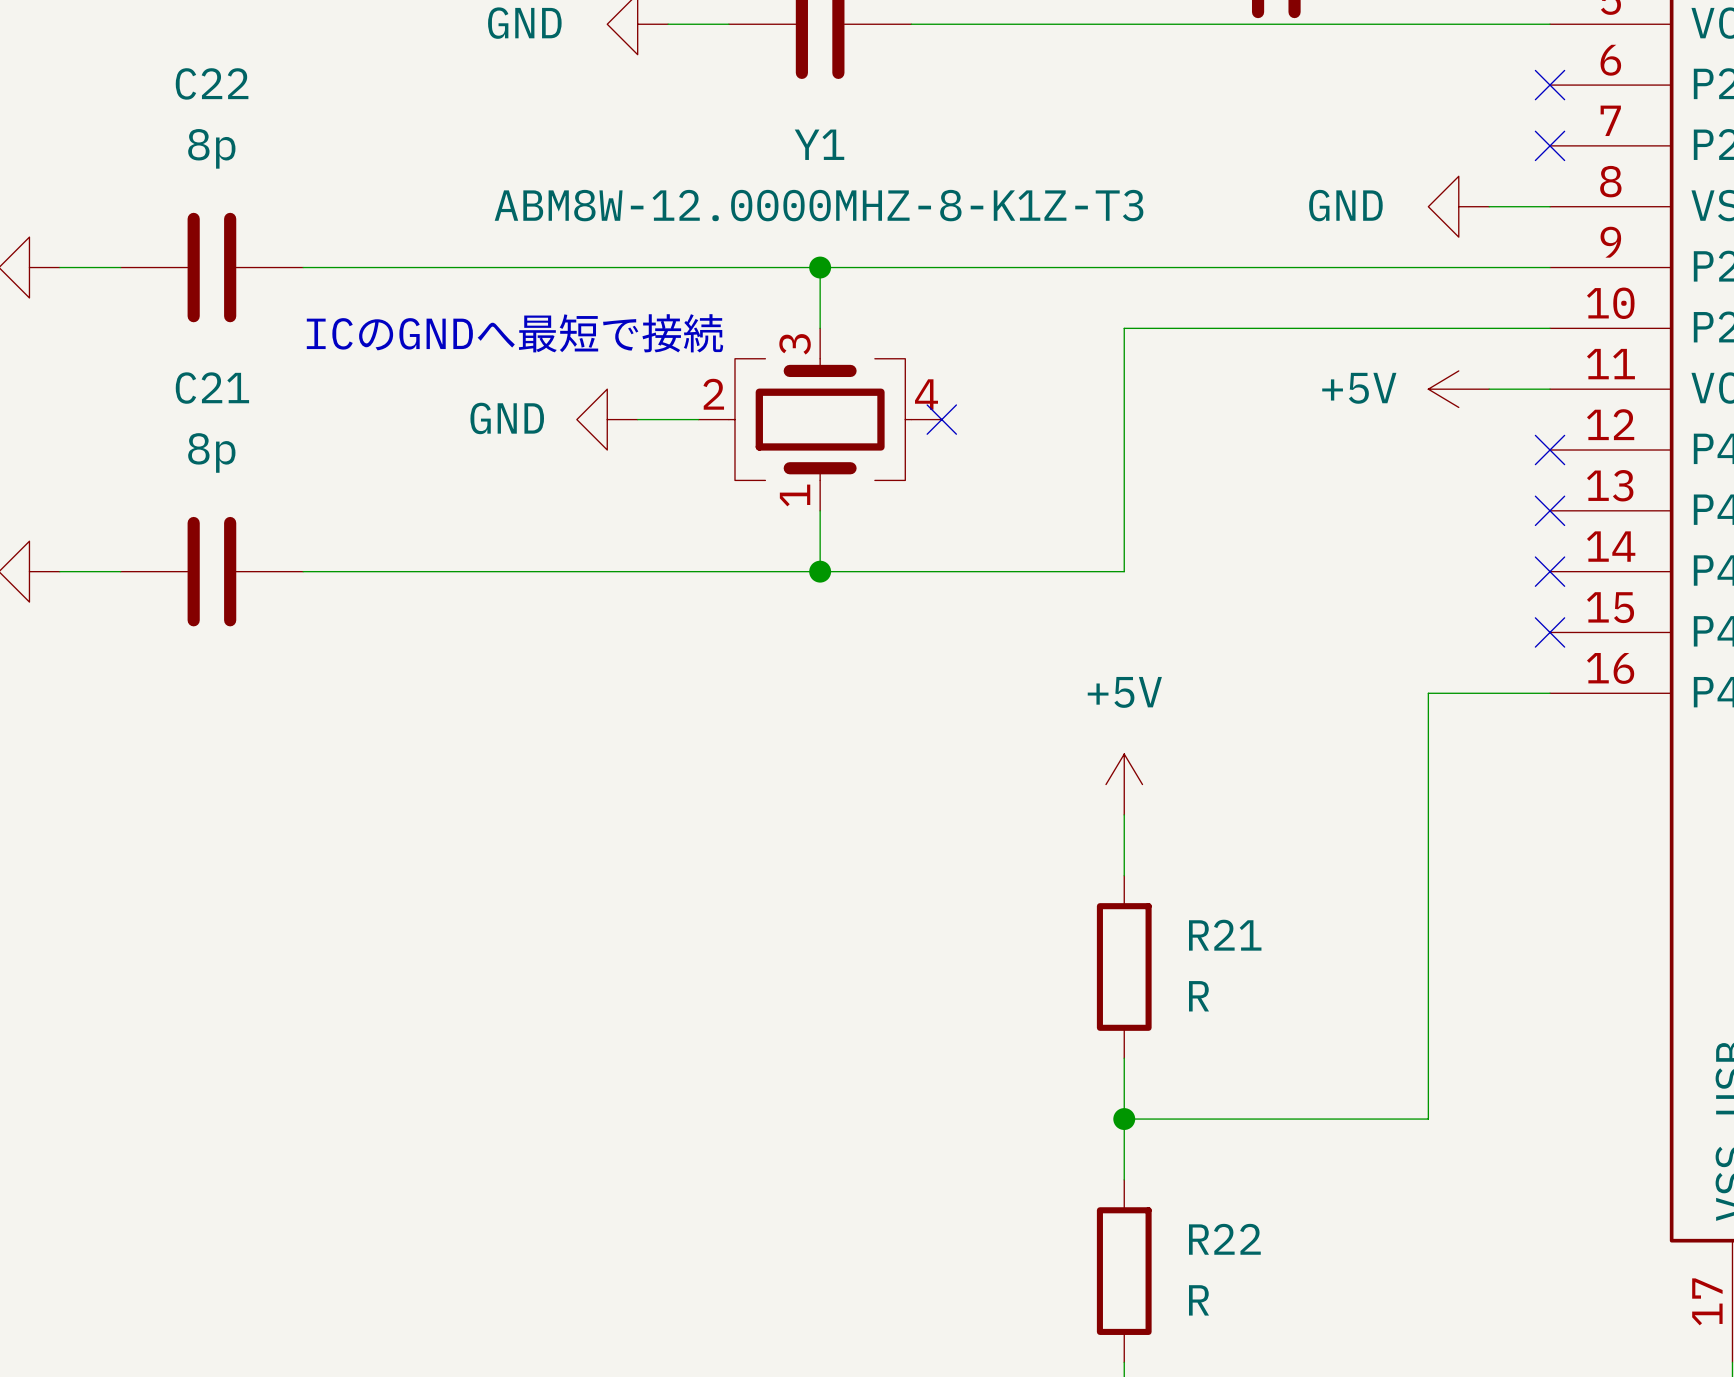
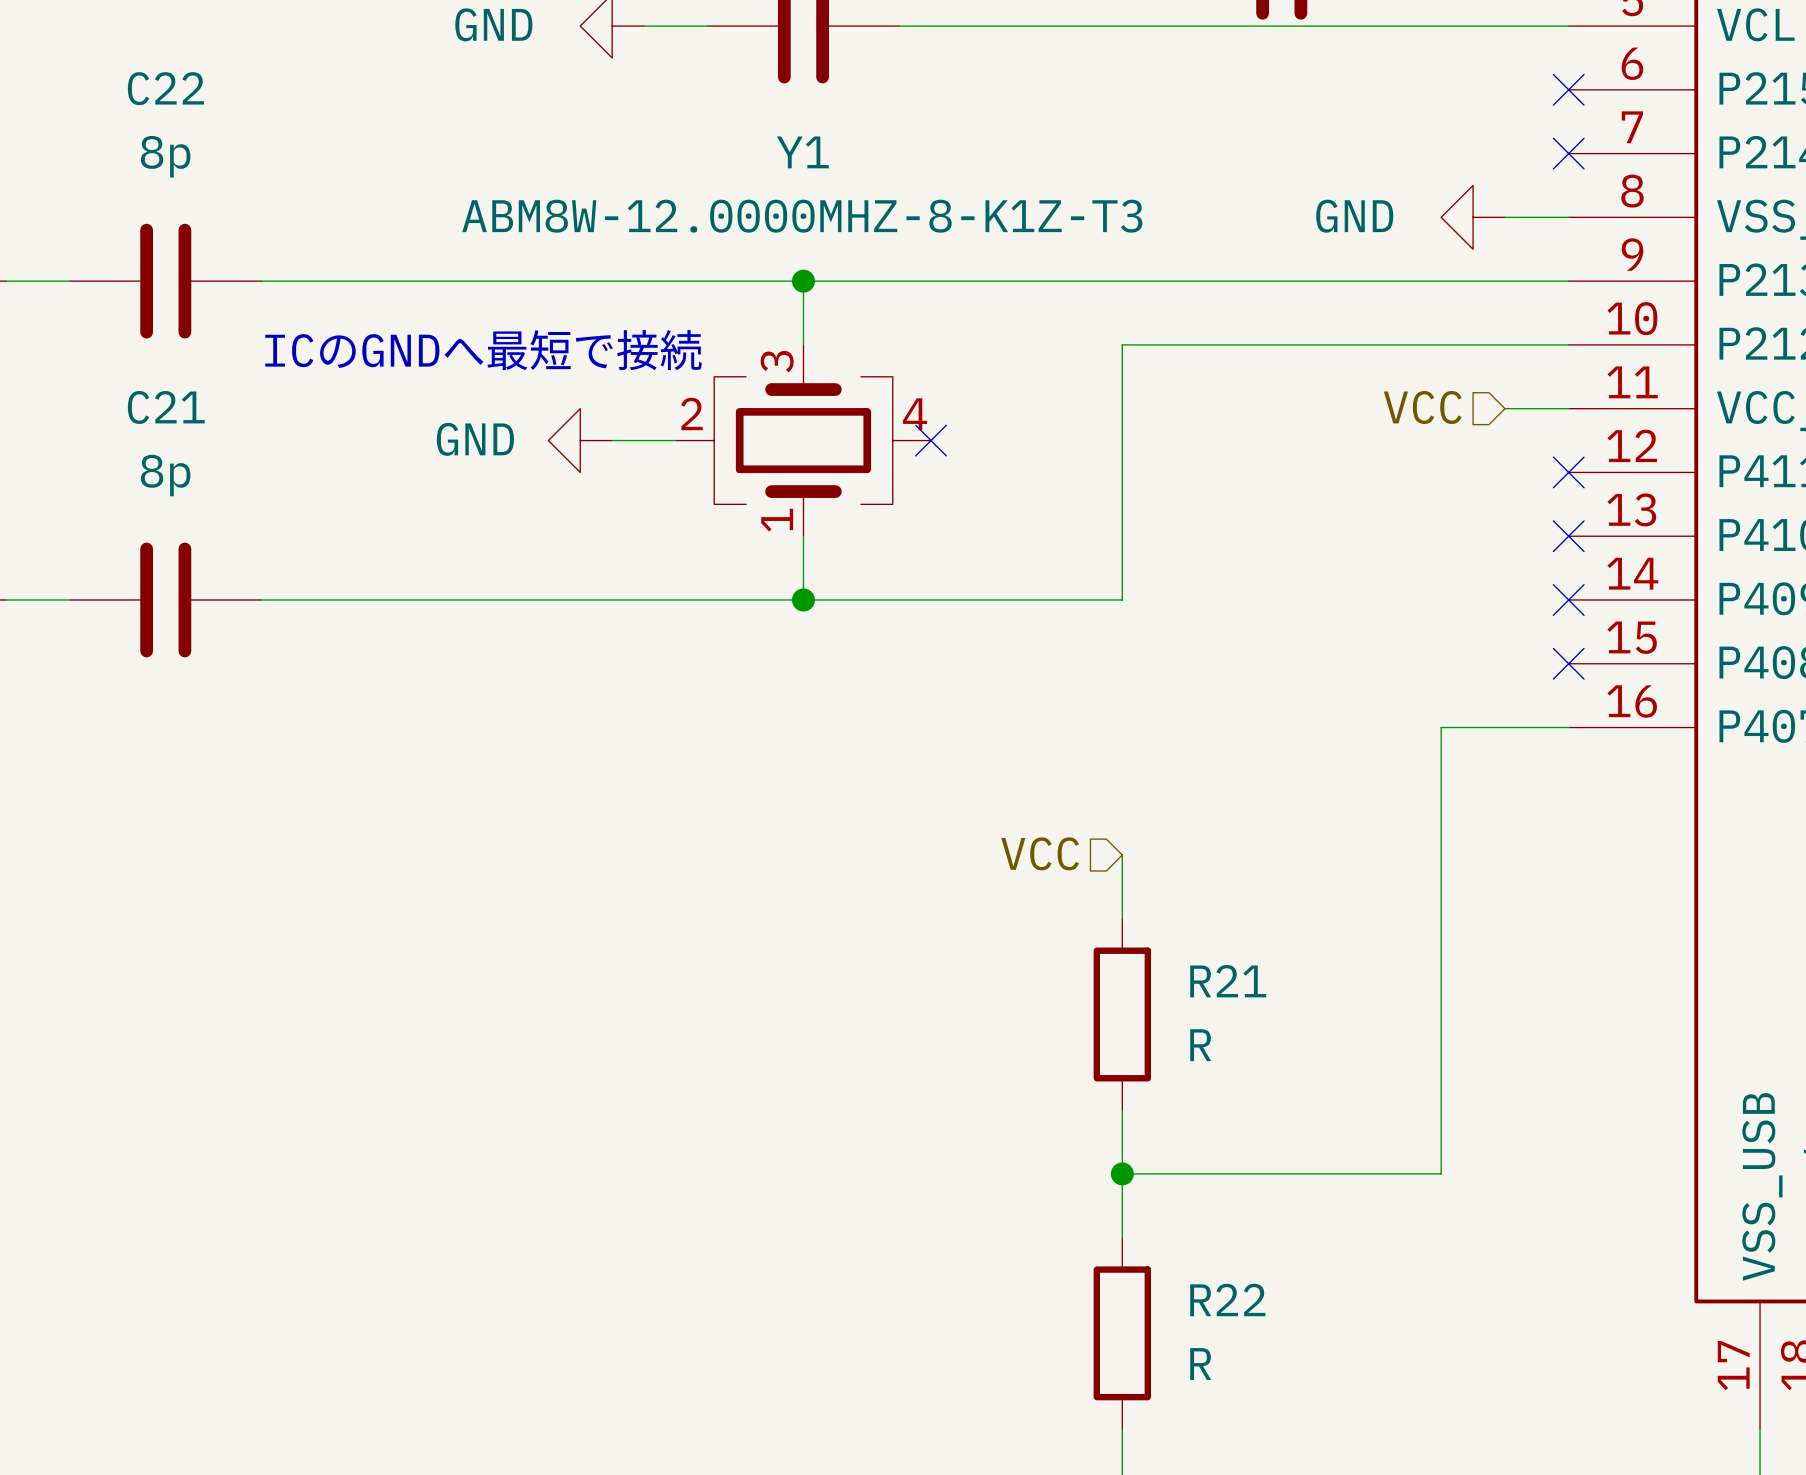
hierarchical label: none -> VCC (1422, 407)
power symbol: +5V (1458, 389) -> none
power symbol: +5V (1124, 784) -> none
hierarchical label: none -> VCC (1040, 853)

